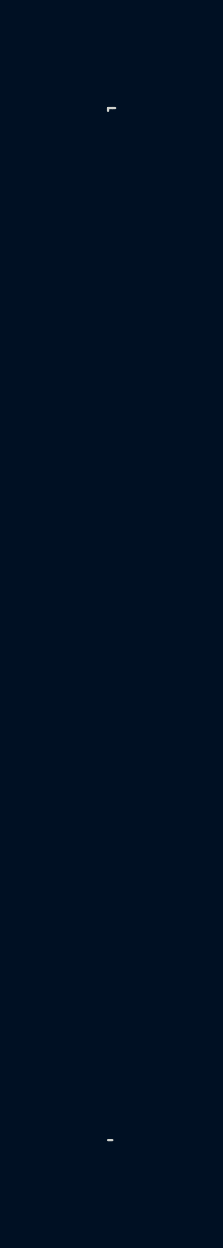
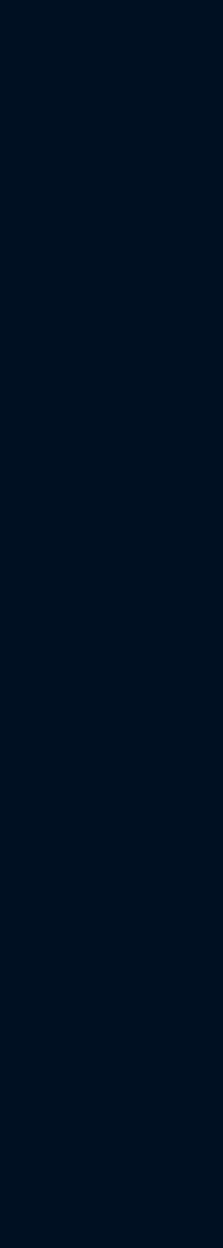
board edge: (115, 108) (108, 108) (108, 110) -> none
board edge: (108, 1140) (112, 1140) -> none

